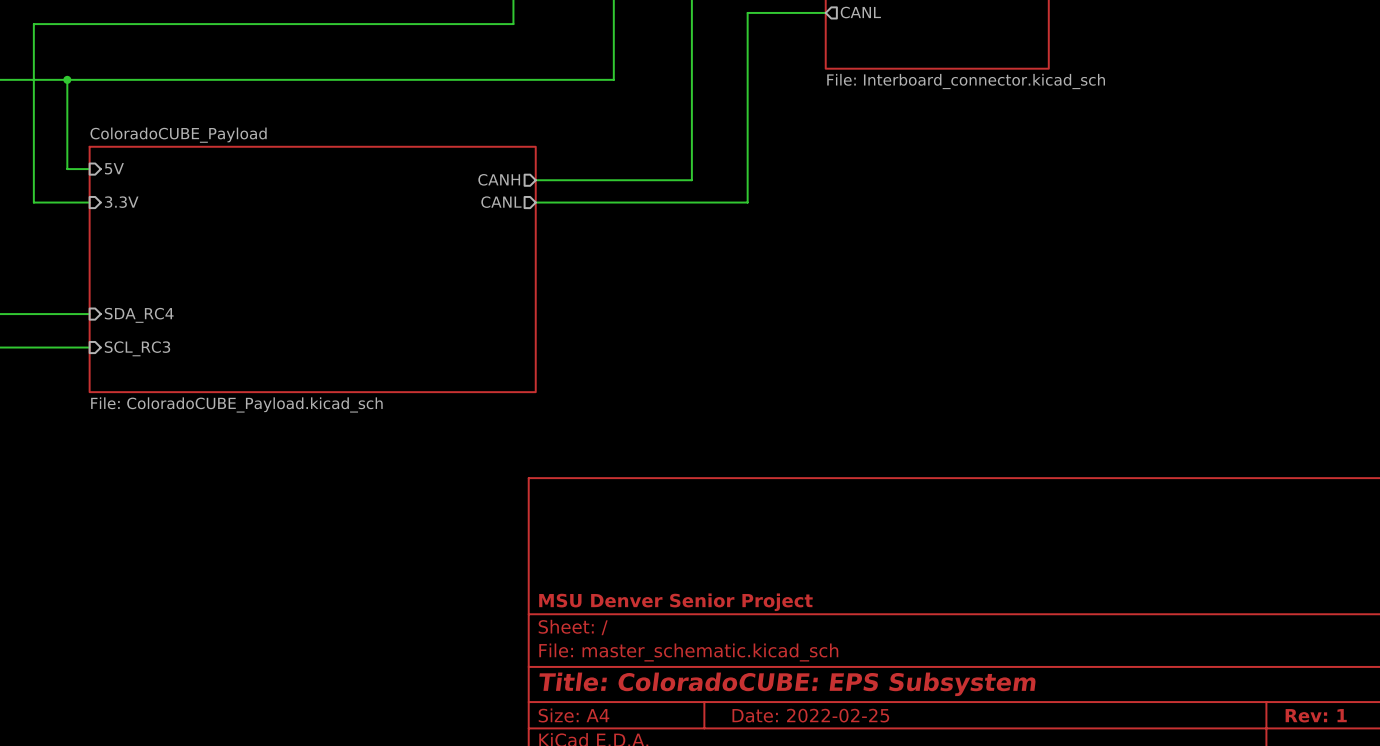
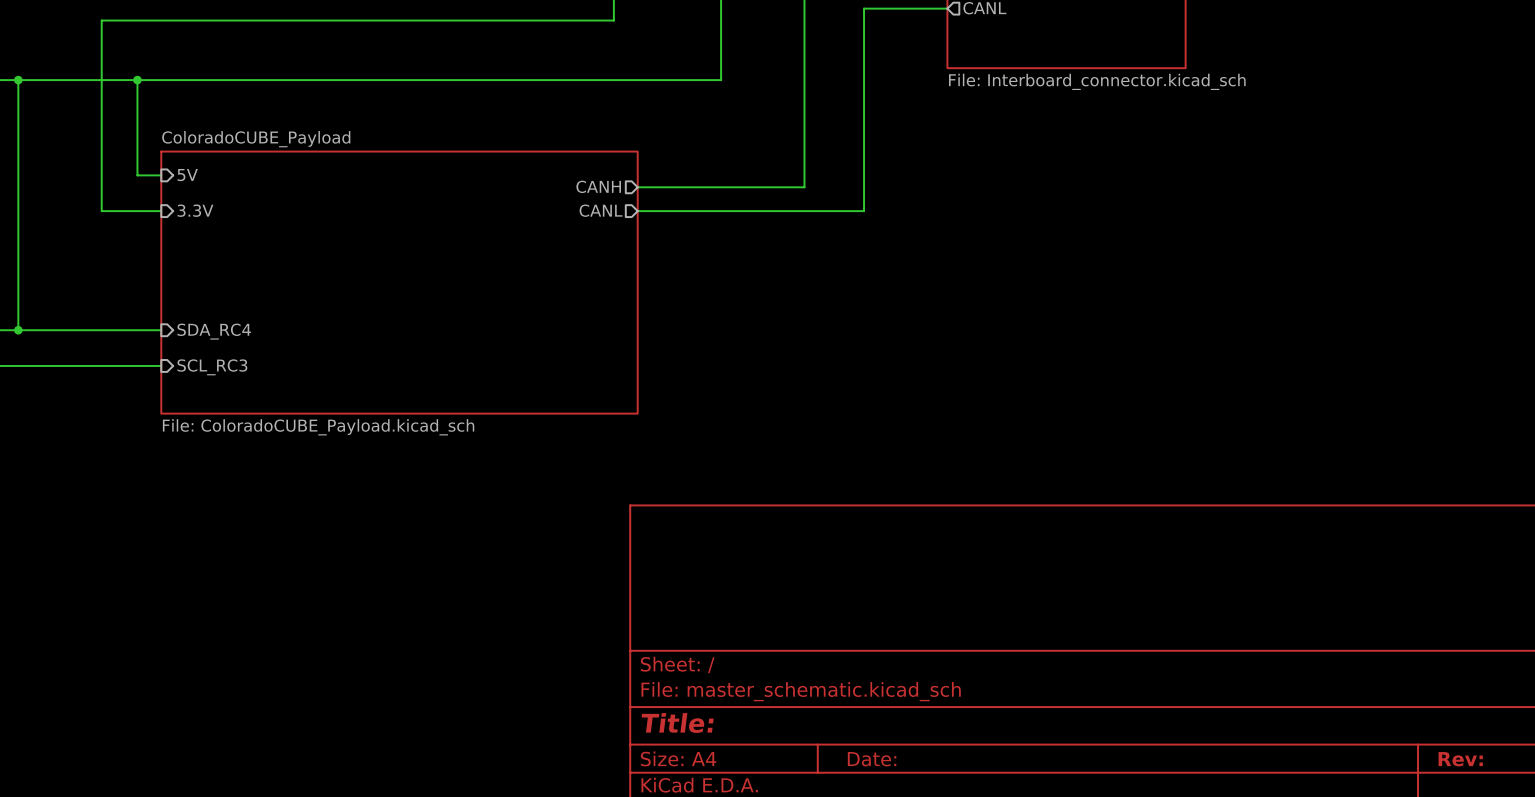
title block: MSU Denver Senior Project (675, 602) -> none
title block: Title: ColoradoCUBE: EPS Subsystem (787, 684) -> Title: (677, 723)
title block: Date: 2022-02-25 (810, 715) -> Date: (872, 759)
title block: Rev: 1 (1316, 715) -> Rev: (1460, 759)

